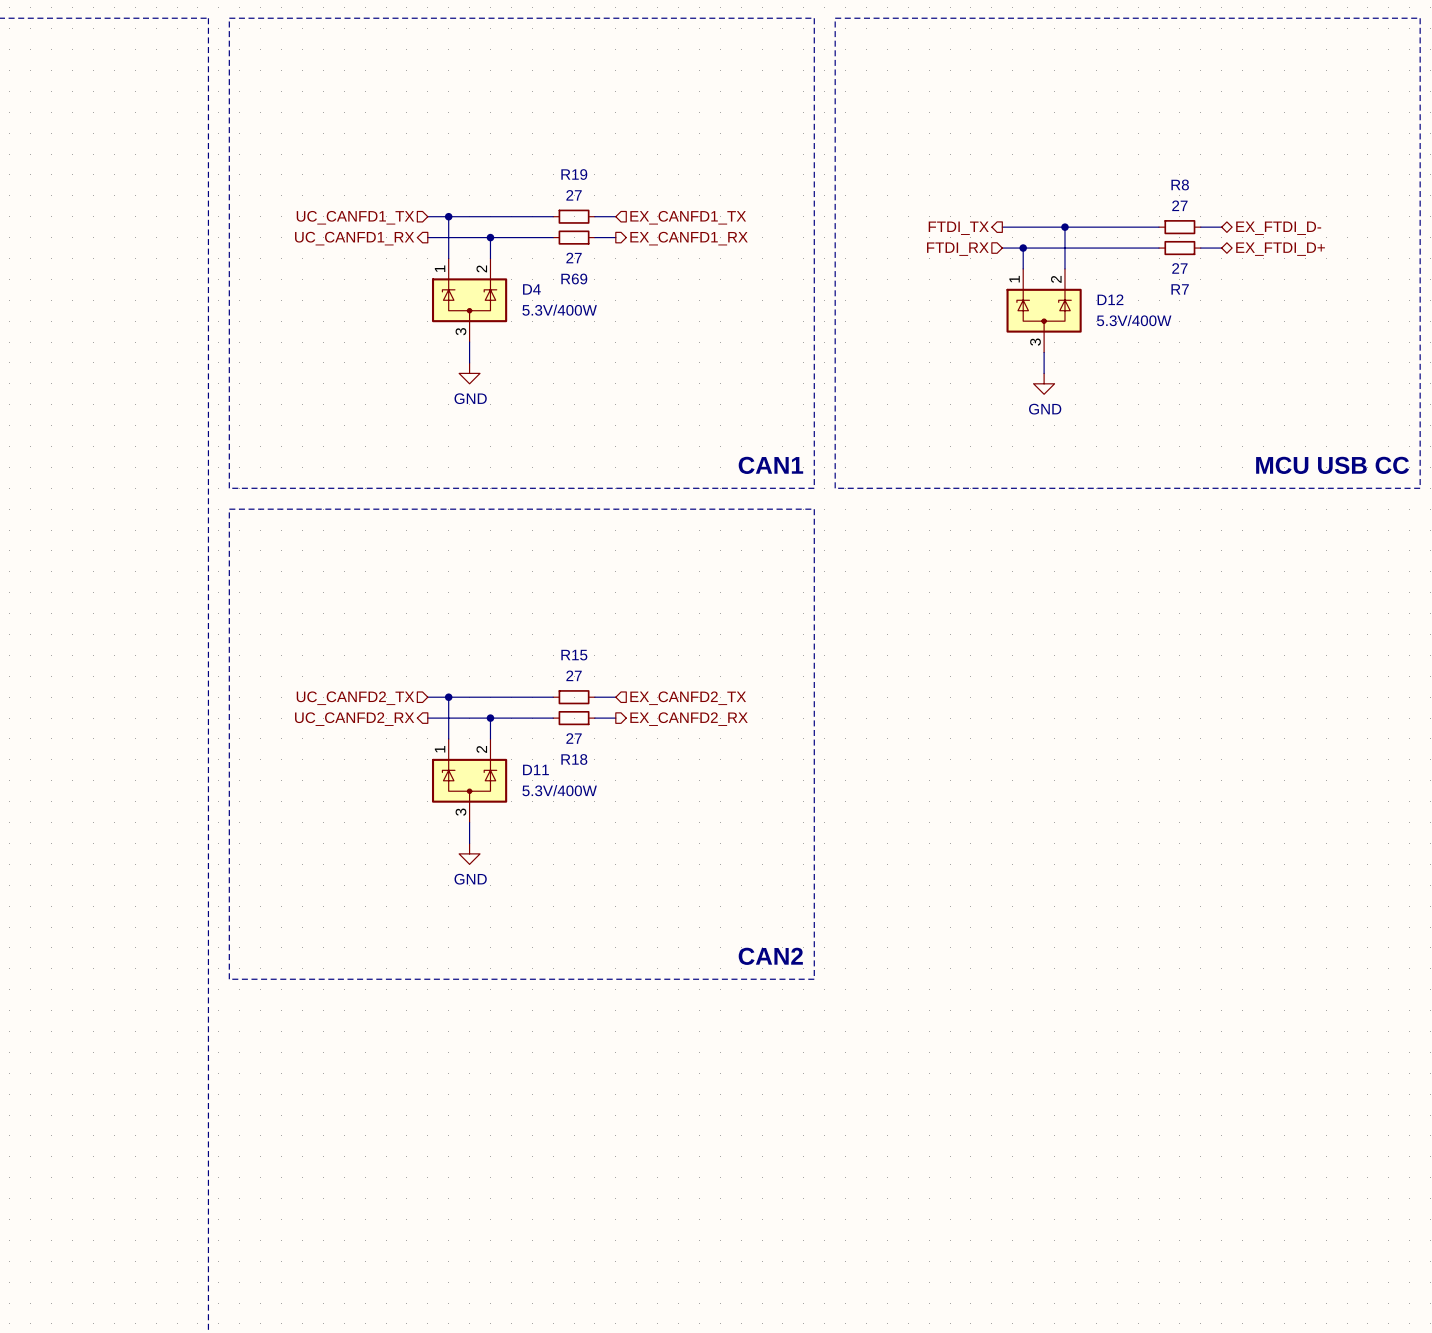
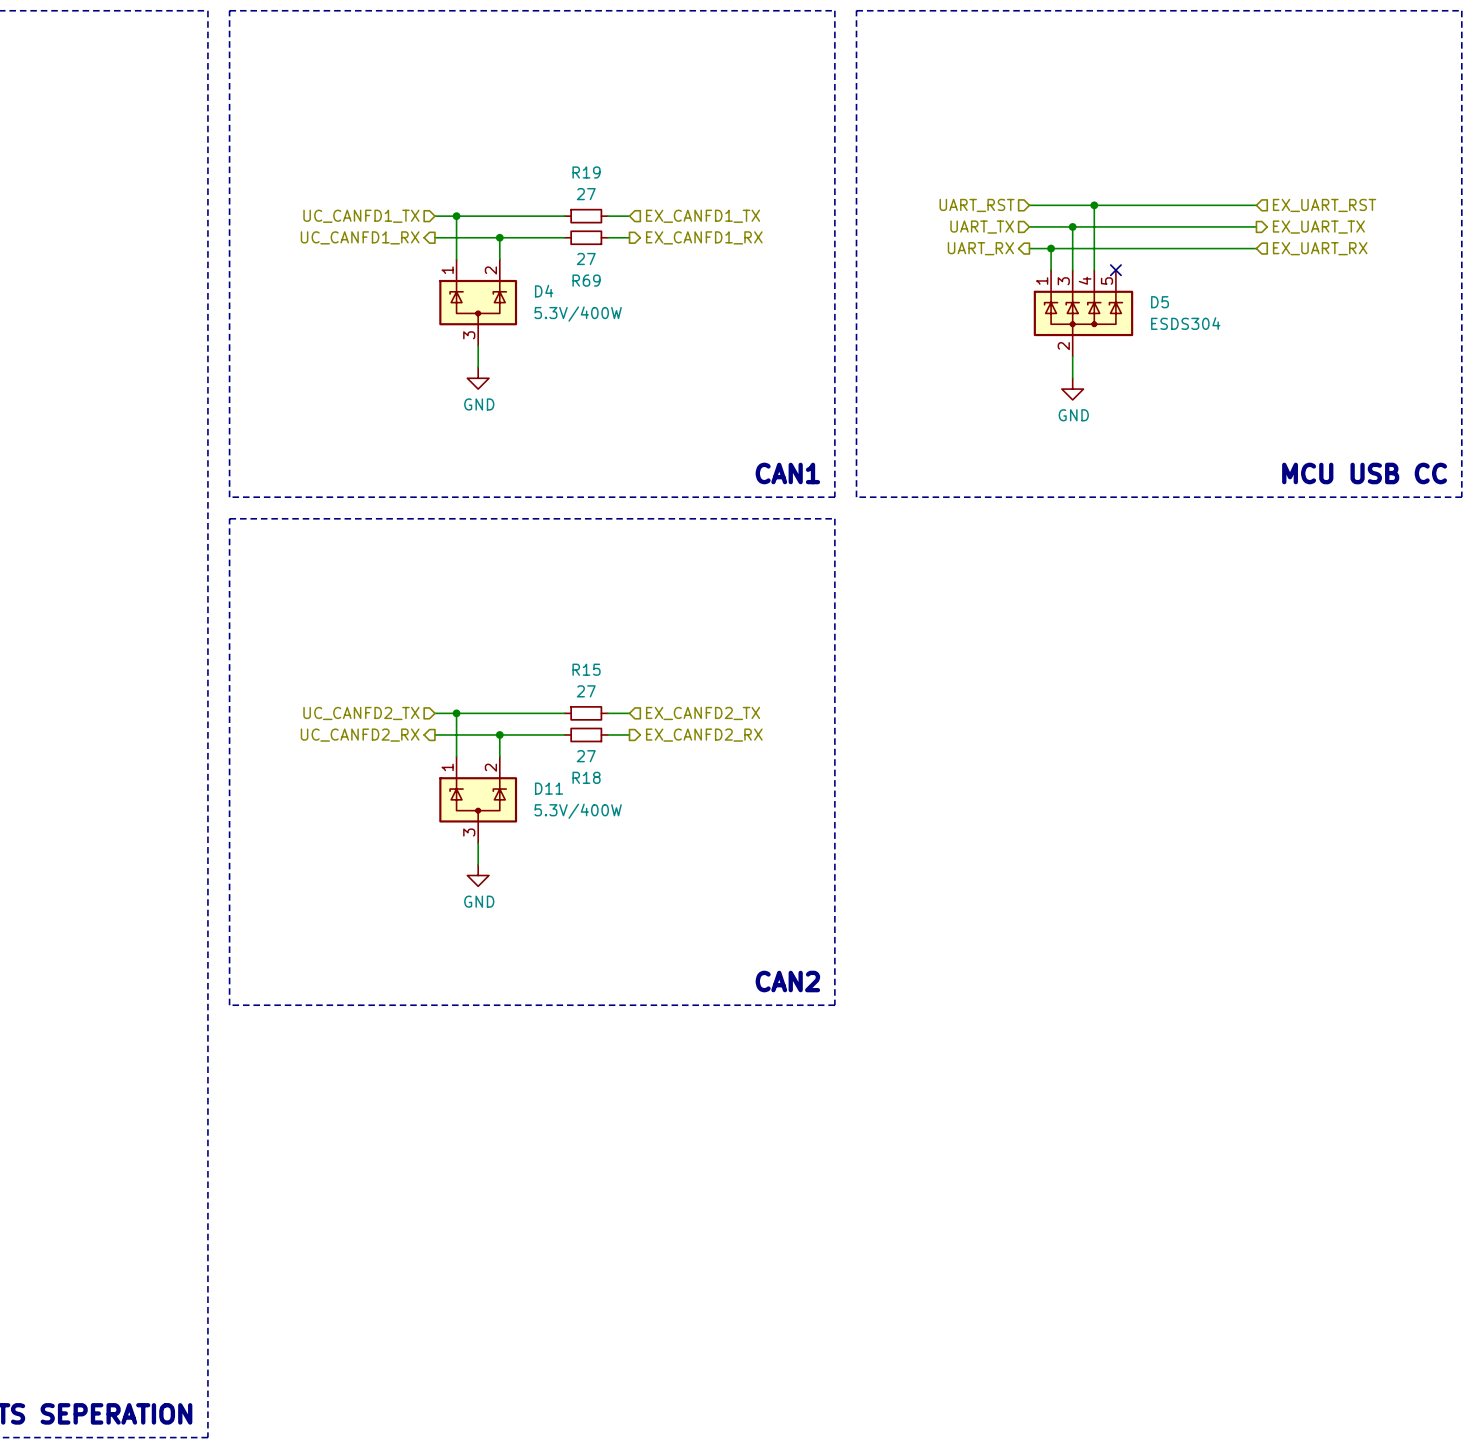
wire: none -> (1029, 205) (1256, 205)
wire: none -> (1094, 205) (1094, 226)
junction: none -> (1094, 205)
hierarchical label: none -> UART_RST (977, 205)
hierarchical label: none -> EX_UART_RST (1324, 205)
wire: none -> (1072, 226) (1072, 270)
junction: none -> (1072, 226)
junction: (1064, 227) -> none
wire: none -> (1191, 226) (1234, 226)
R8: 27 (1179, 227) -> none
hierarchical label shape: output (958, 228) -> input (982, 227)
hierarchical label: FTDI_TX (958, 228) -> UART_TX (982, 227)
hierarchical label shape: bidirectional (1278, 228) -> output (1318, 227)
hierarchical label: EX_FTDI_D- (1278, 228) -> EX_UART_TX (1318, 227)
wire: none -> (1191, 248) (1234, 248)
R7: 27 (1179, 248) -> none
hierarchical label shape: input (957, 249) -> output (980, 248)
hierarchical label: FTDI_RX (957, 249) -> UART_RX (980, 248)
hierarchical label shape: bidirectional (1280, 249) -> input (1320, 248)
hierarchical label: EX_FTDI_D+ (1280, 249) -> EX_UART_RX (1320, 248)
no-connect mark: none -> (1115, 270)
D12: 5.3V/400W (1044, 310) -> none
D5: none -> ESDS304 (1083, 313)

